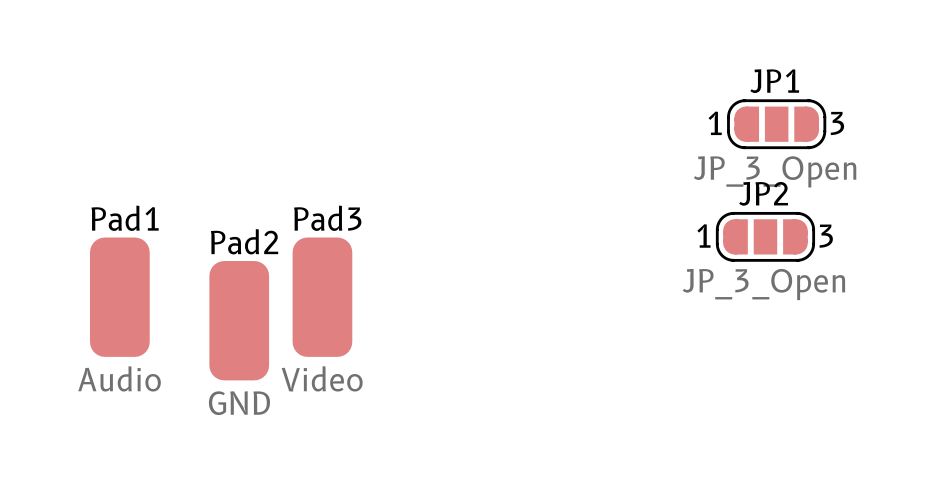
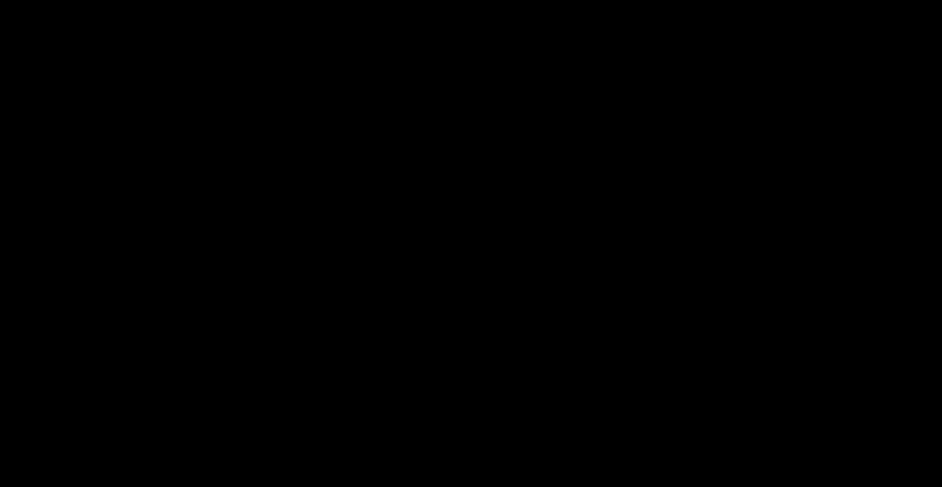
JP1: JP_3_Open (776, 124) -> none
JP2: JP_3_Open (765, 236) -> none
Pad1: Audio (119, 297) -> none
Pad3: Video (322, 297) -> none
Pad2: GND (239, 320) -> none

